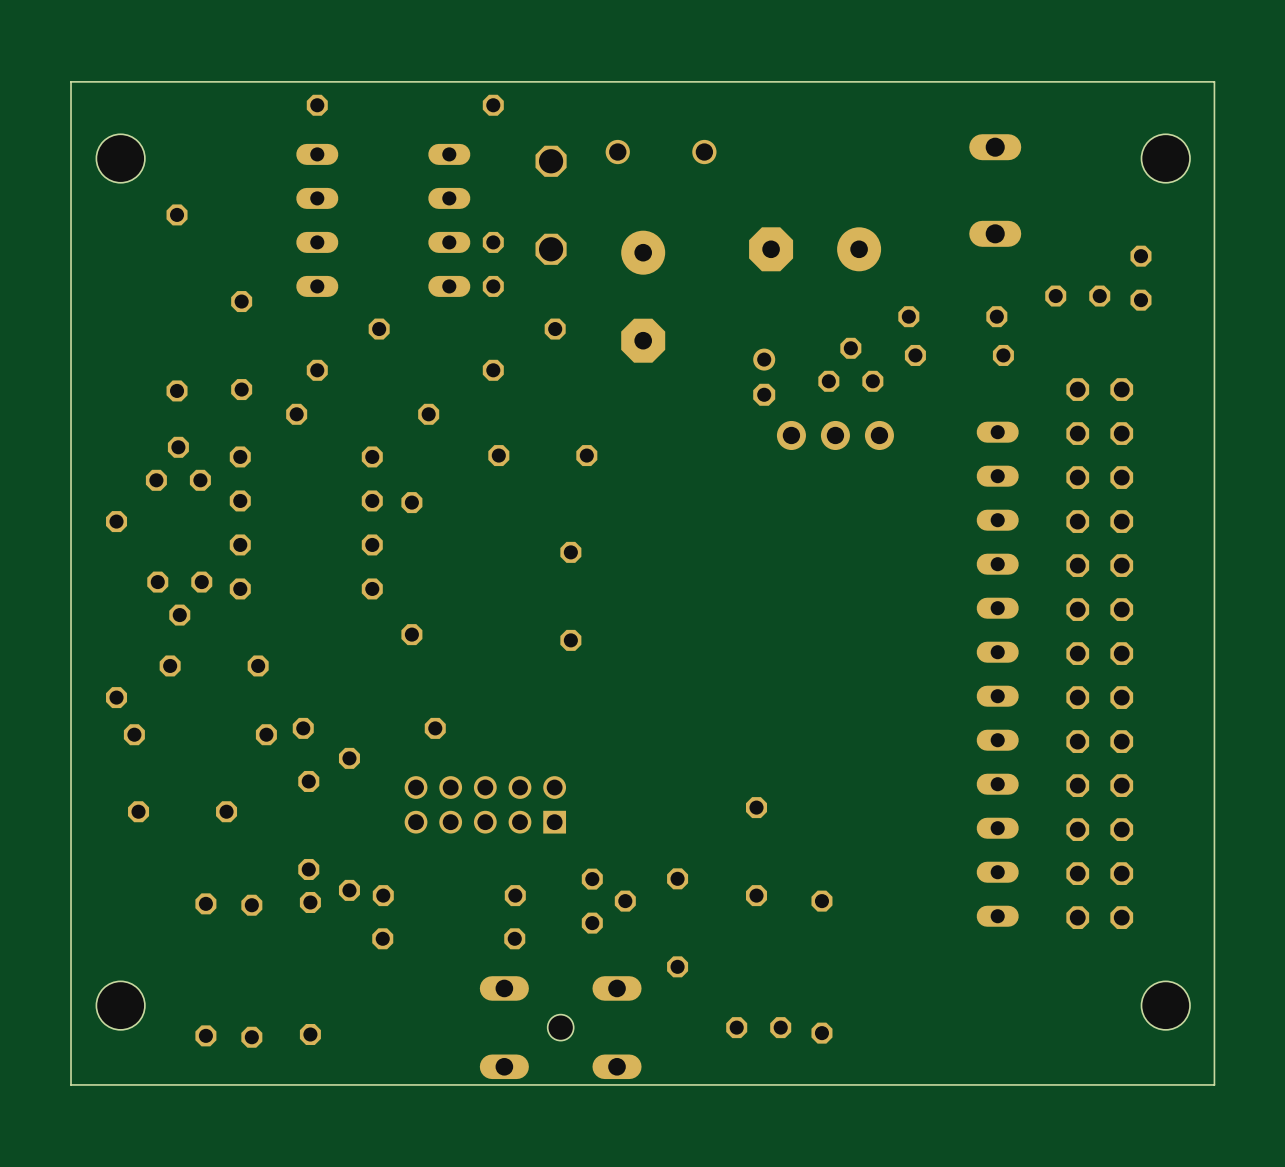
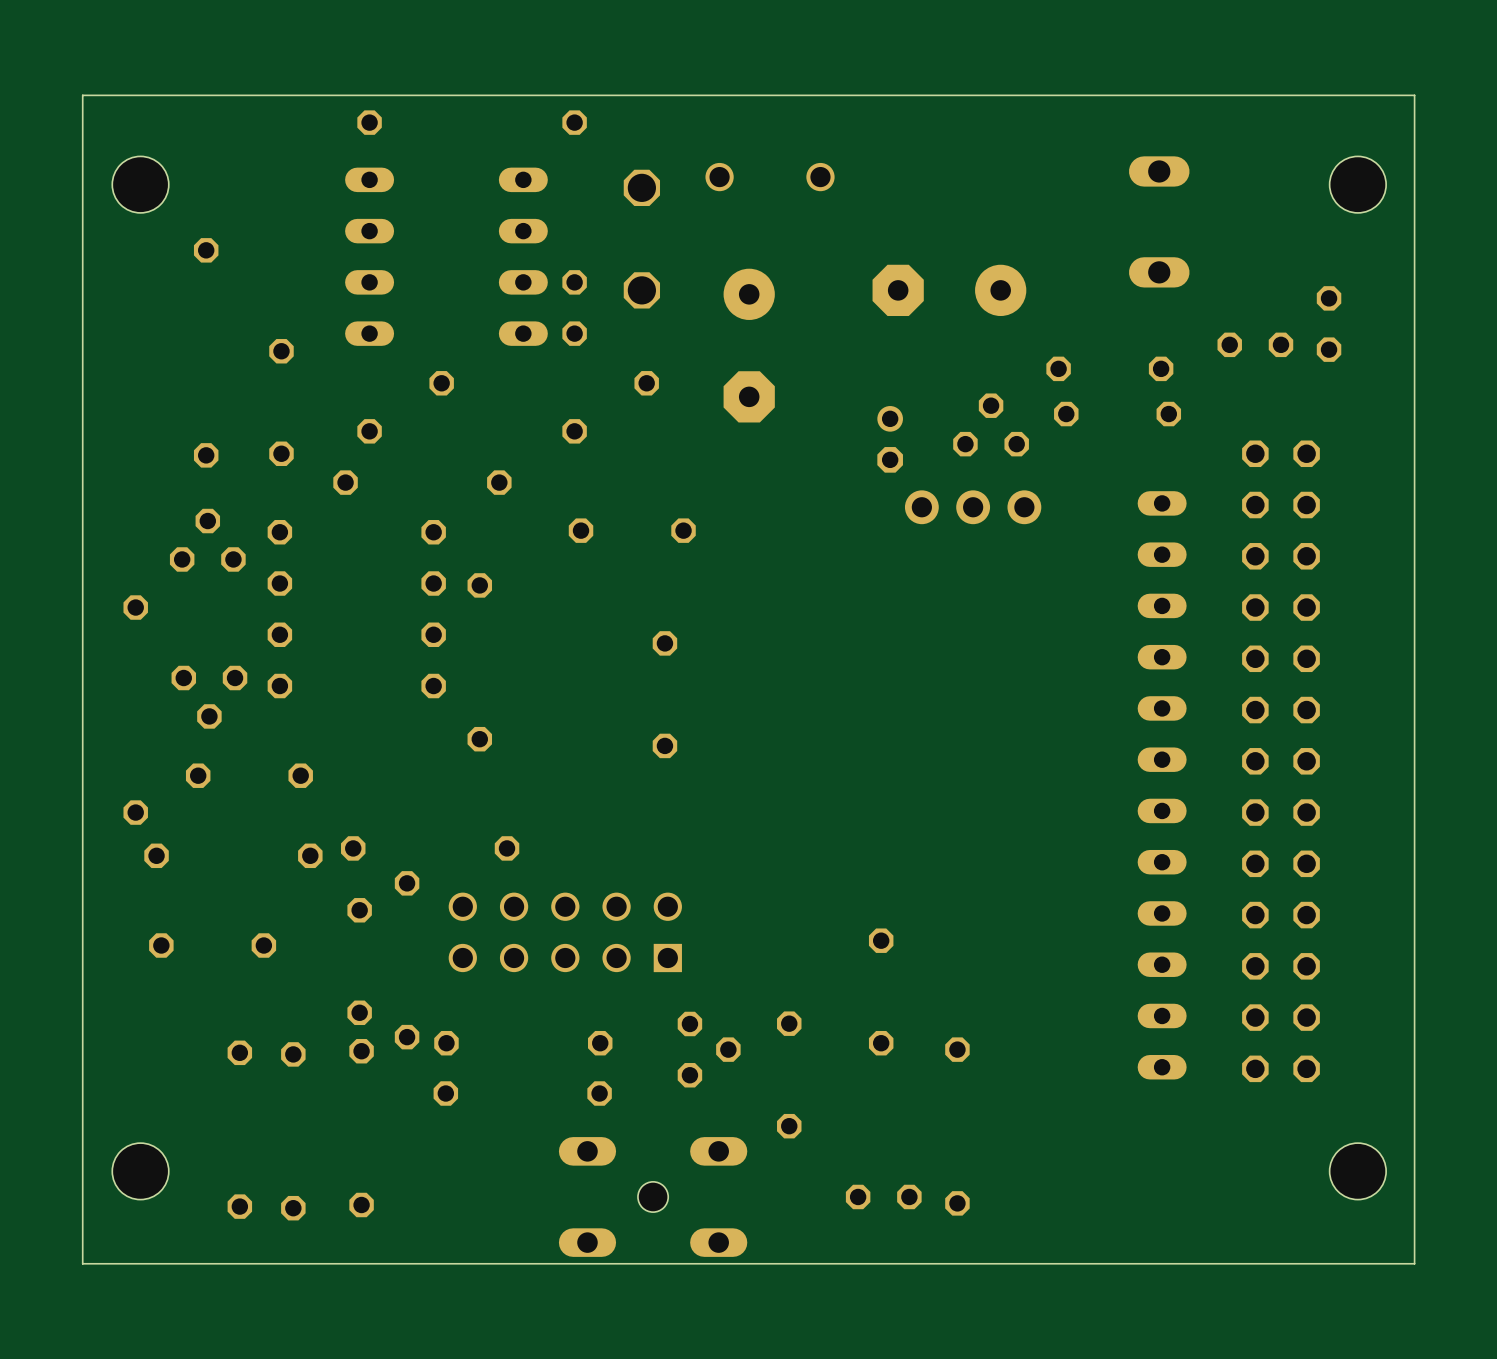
part footprint: [404, 776, 567, 834] -> [448, 892, 682, 973]

